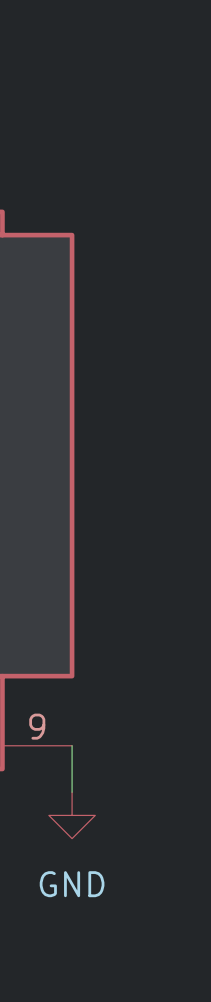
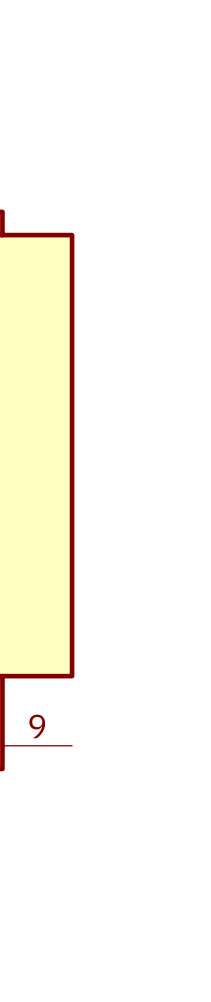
wire: (72, 745) (72, 792) -> none
power symbol: GND (72, 815) -> none

